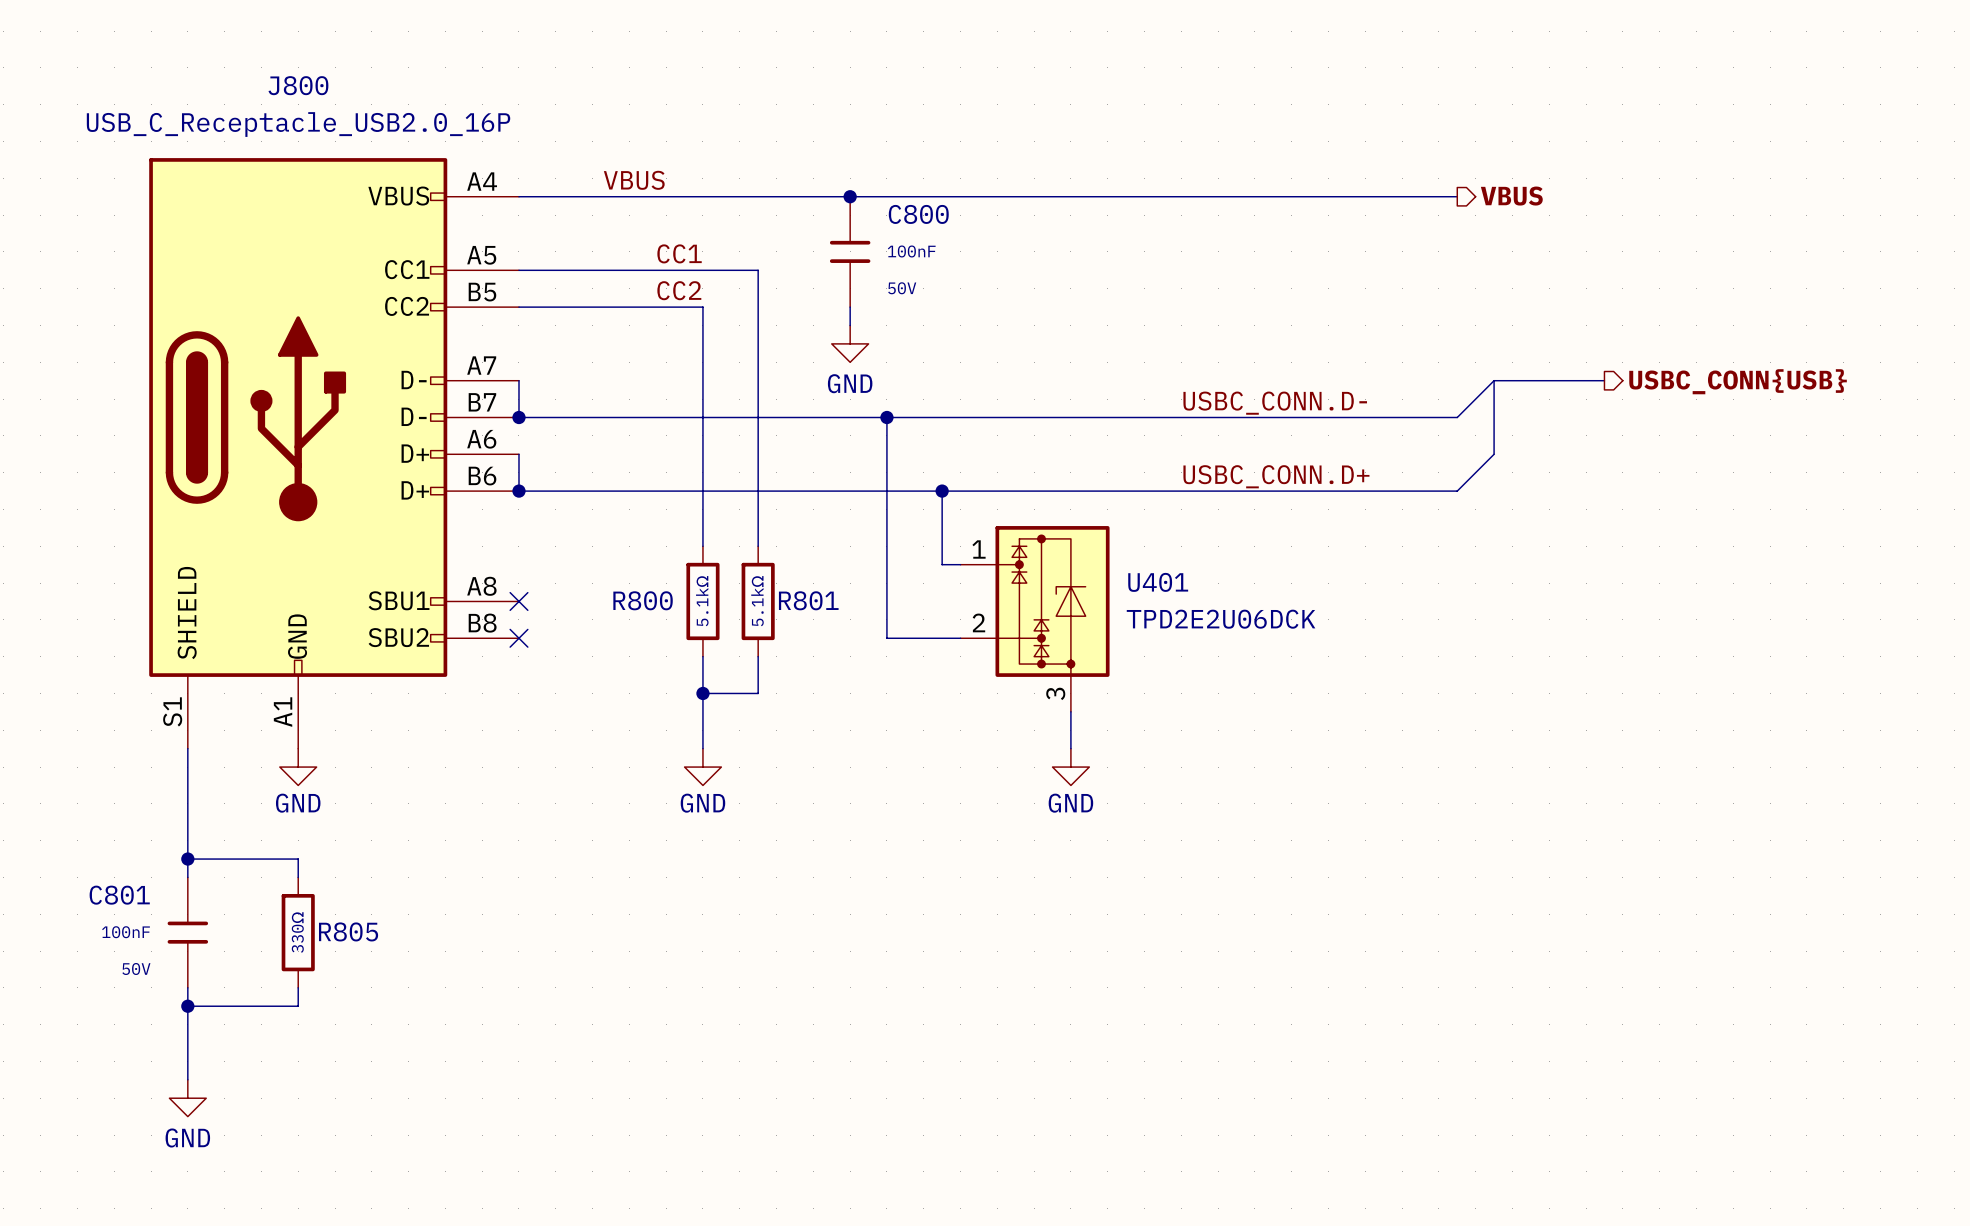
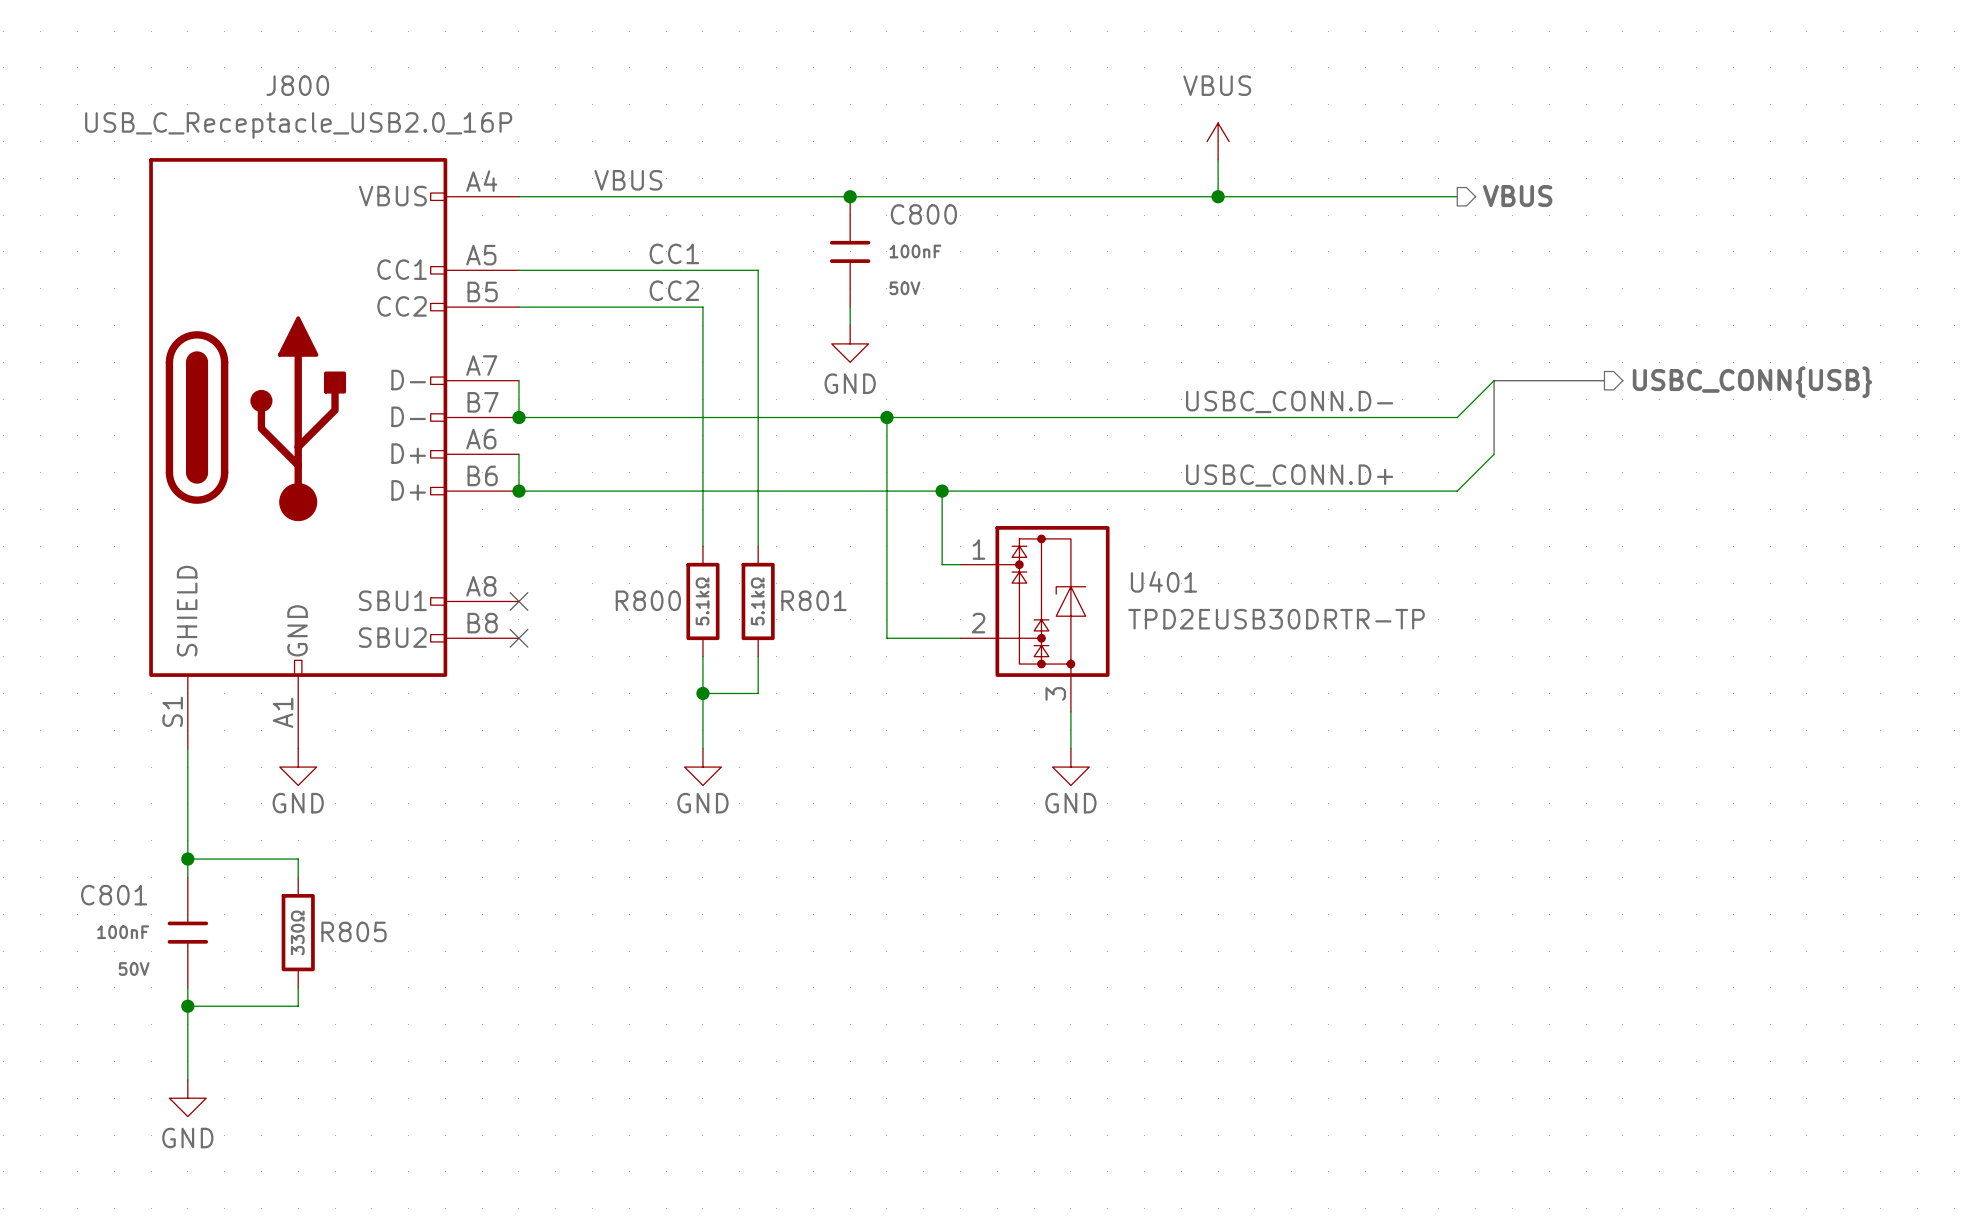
power symbol: none -> VBUS (1218, 141)
wire: none -> (1218, 159) (1218, 196)
junction: none -> (1218, 196)
U401 value: TPD2E2U06DCK (1221, 619) -> TPD2EUSB30DRTR-TP (1276, 619)

